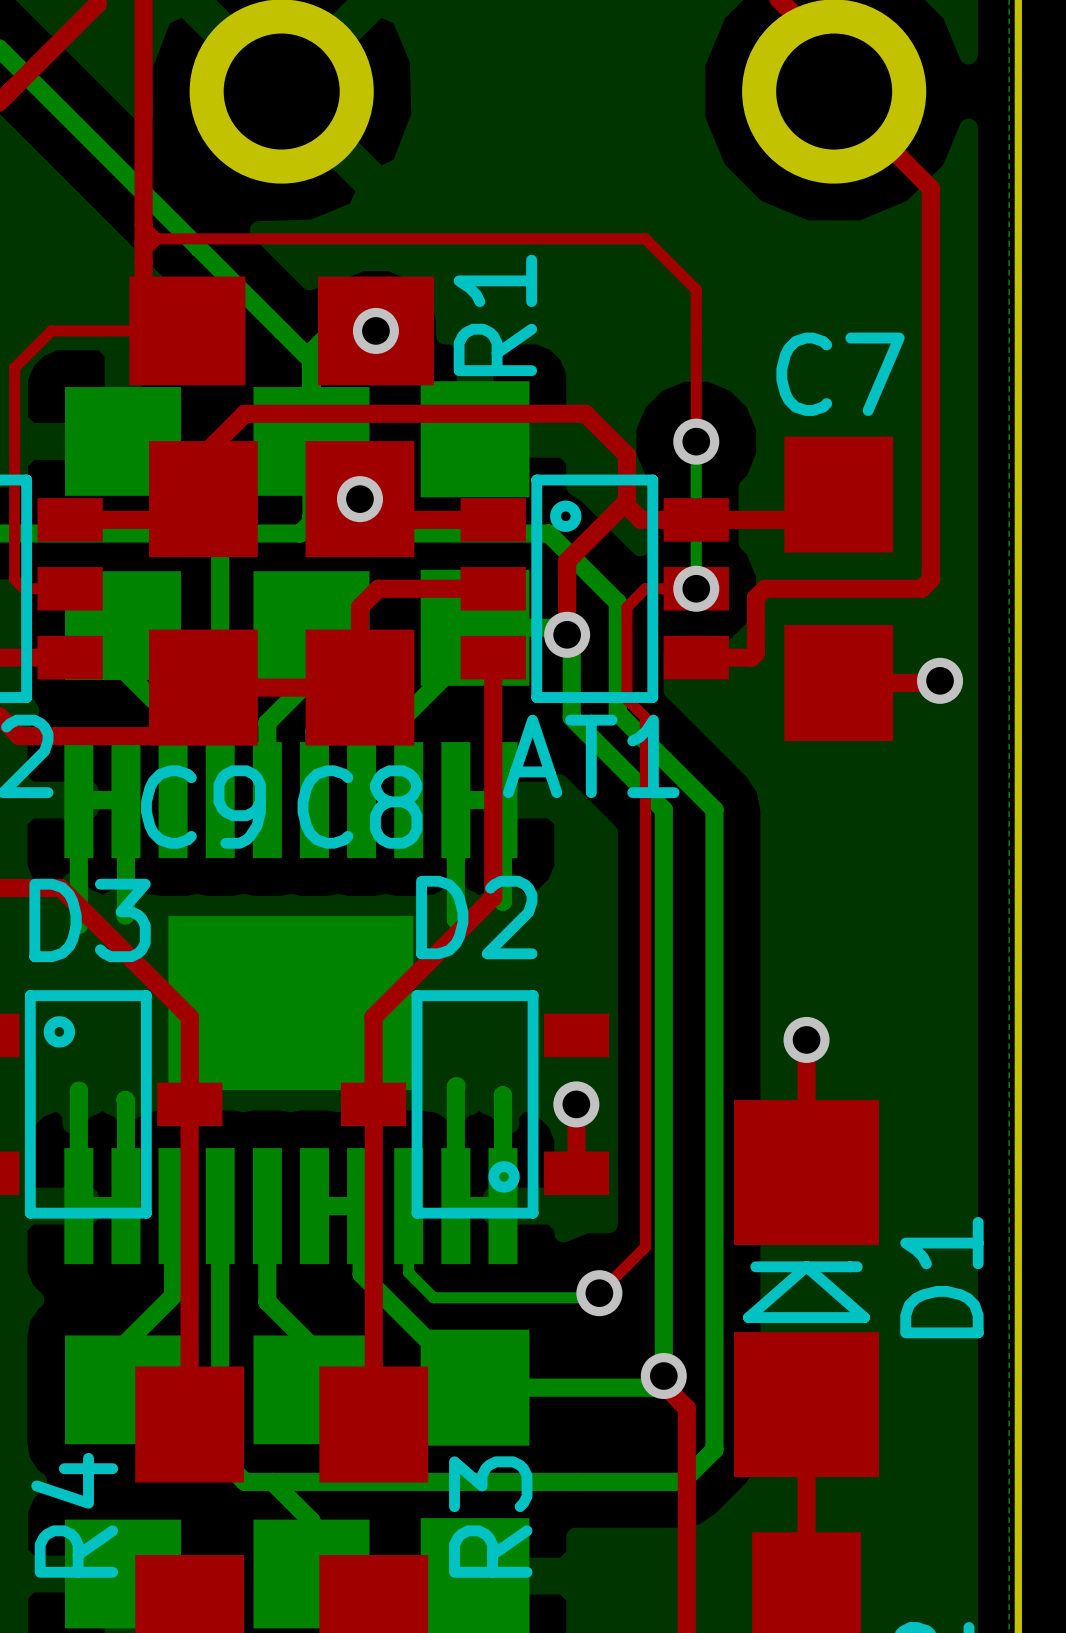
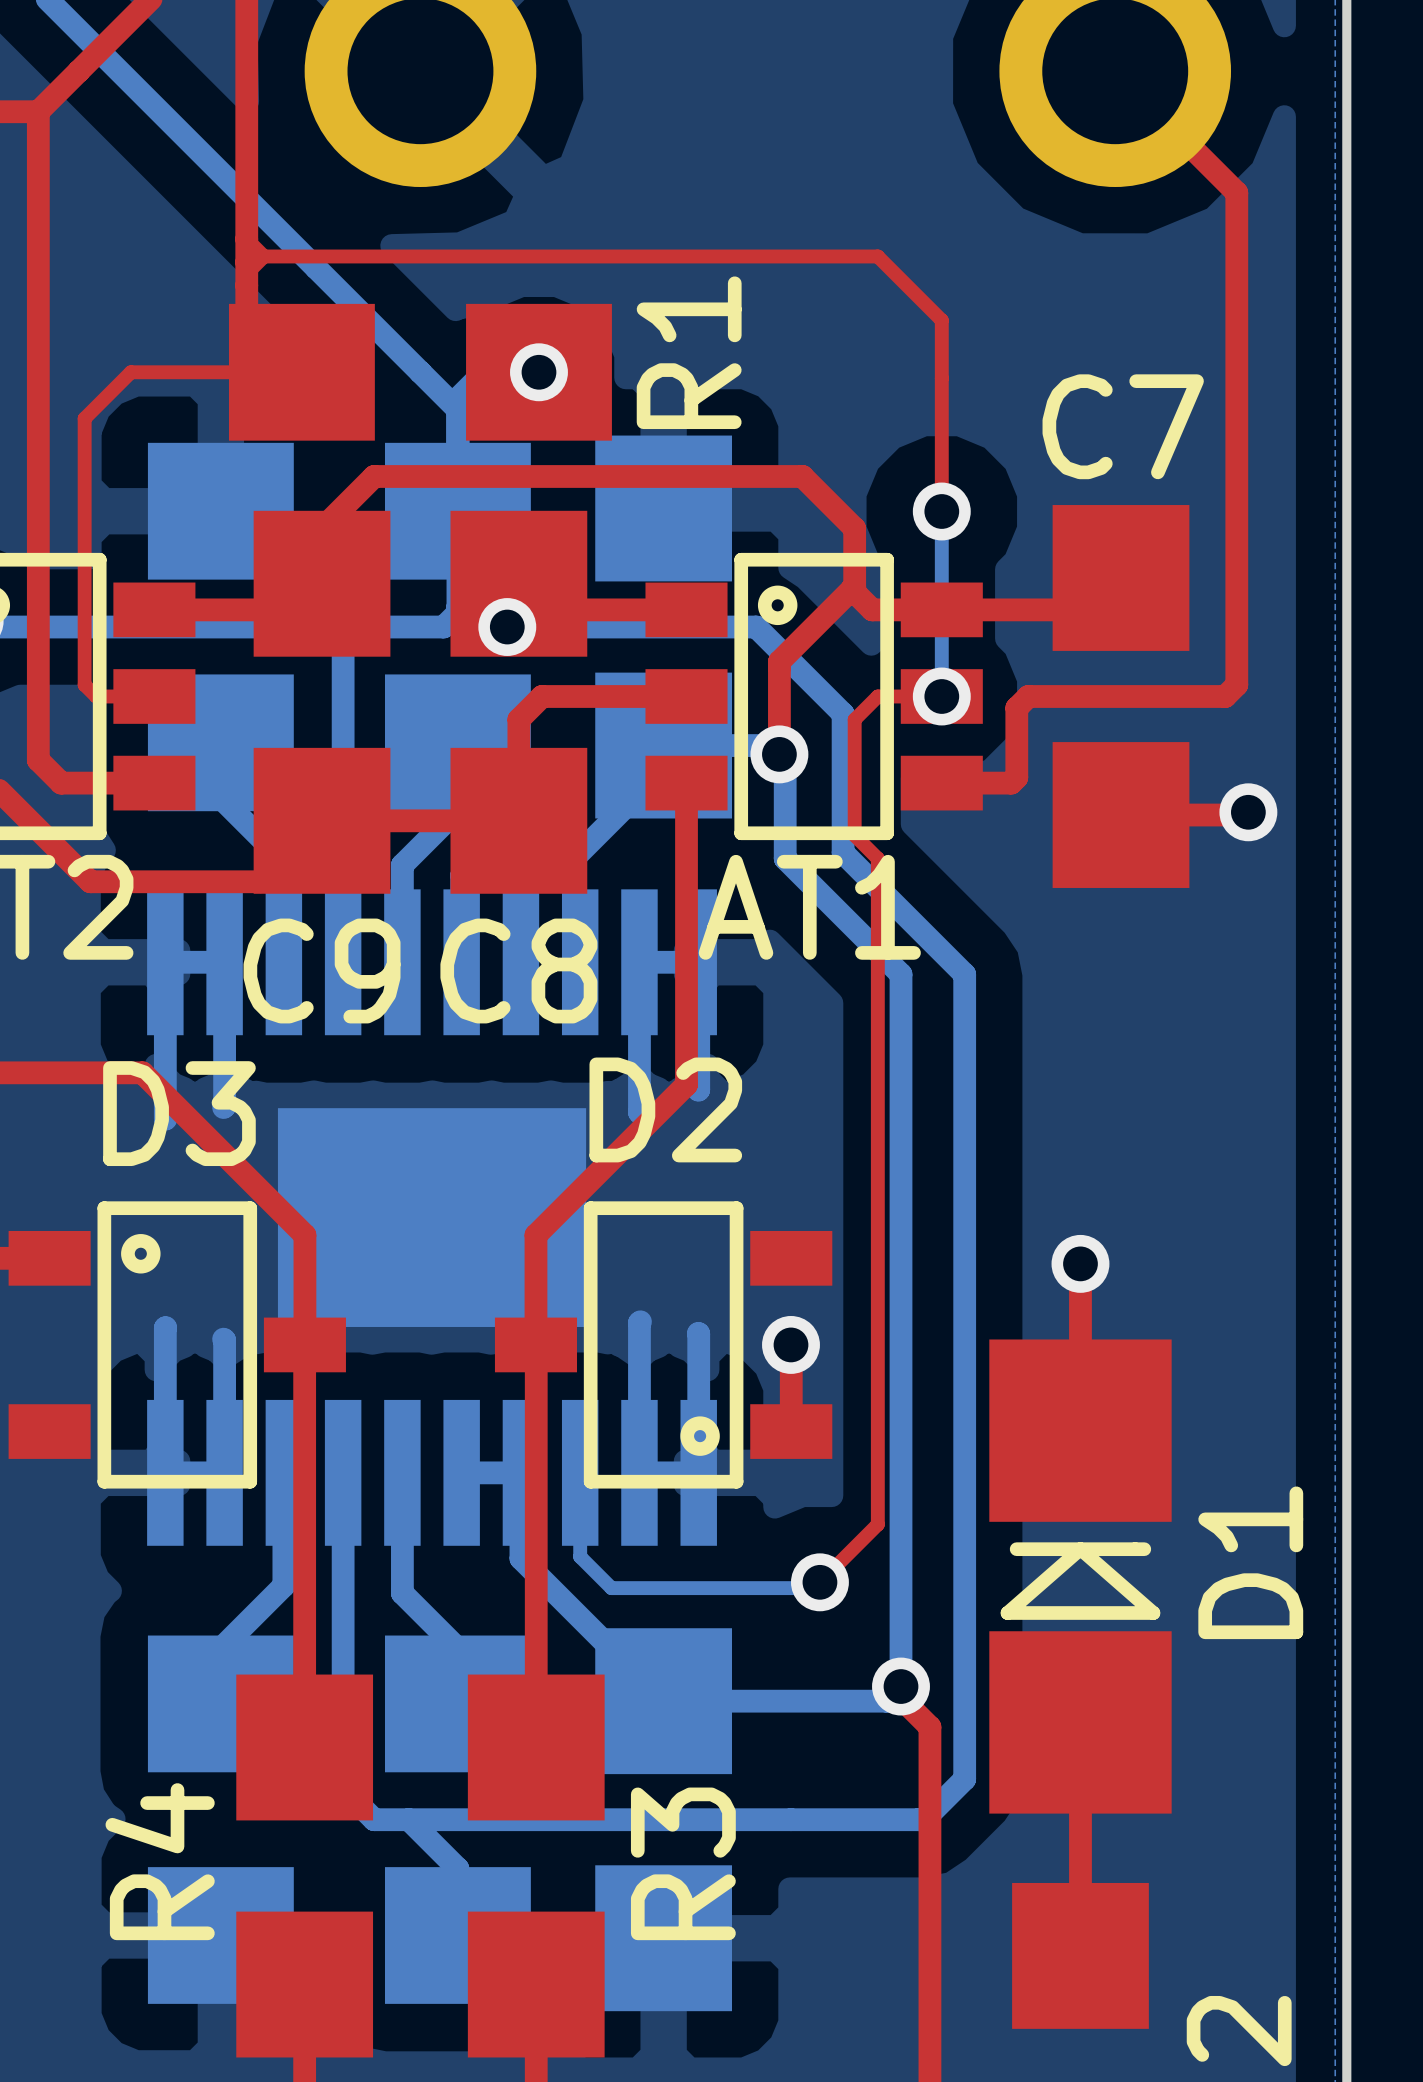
via position: (359, 499) -> (507, 627)

